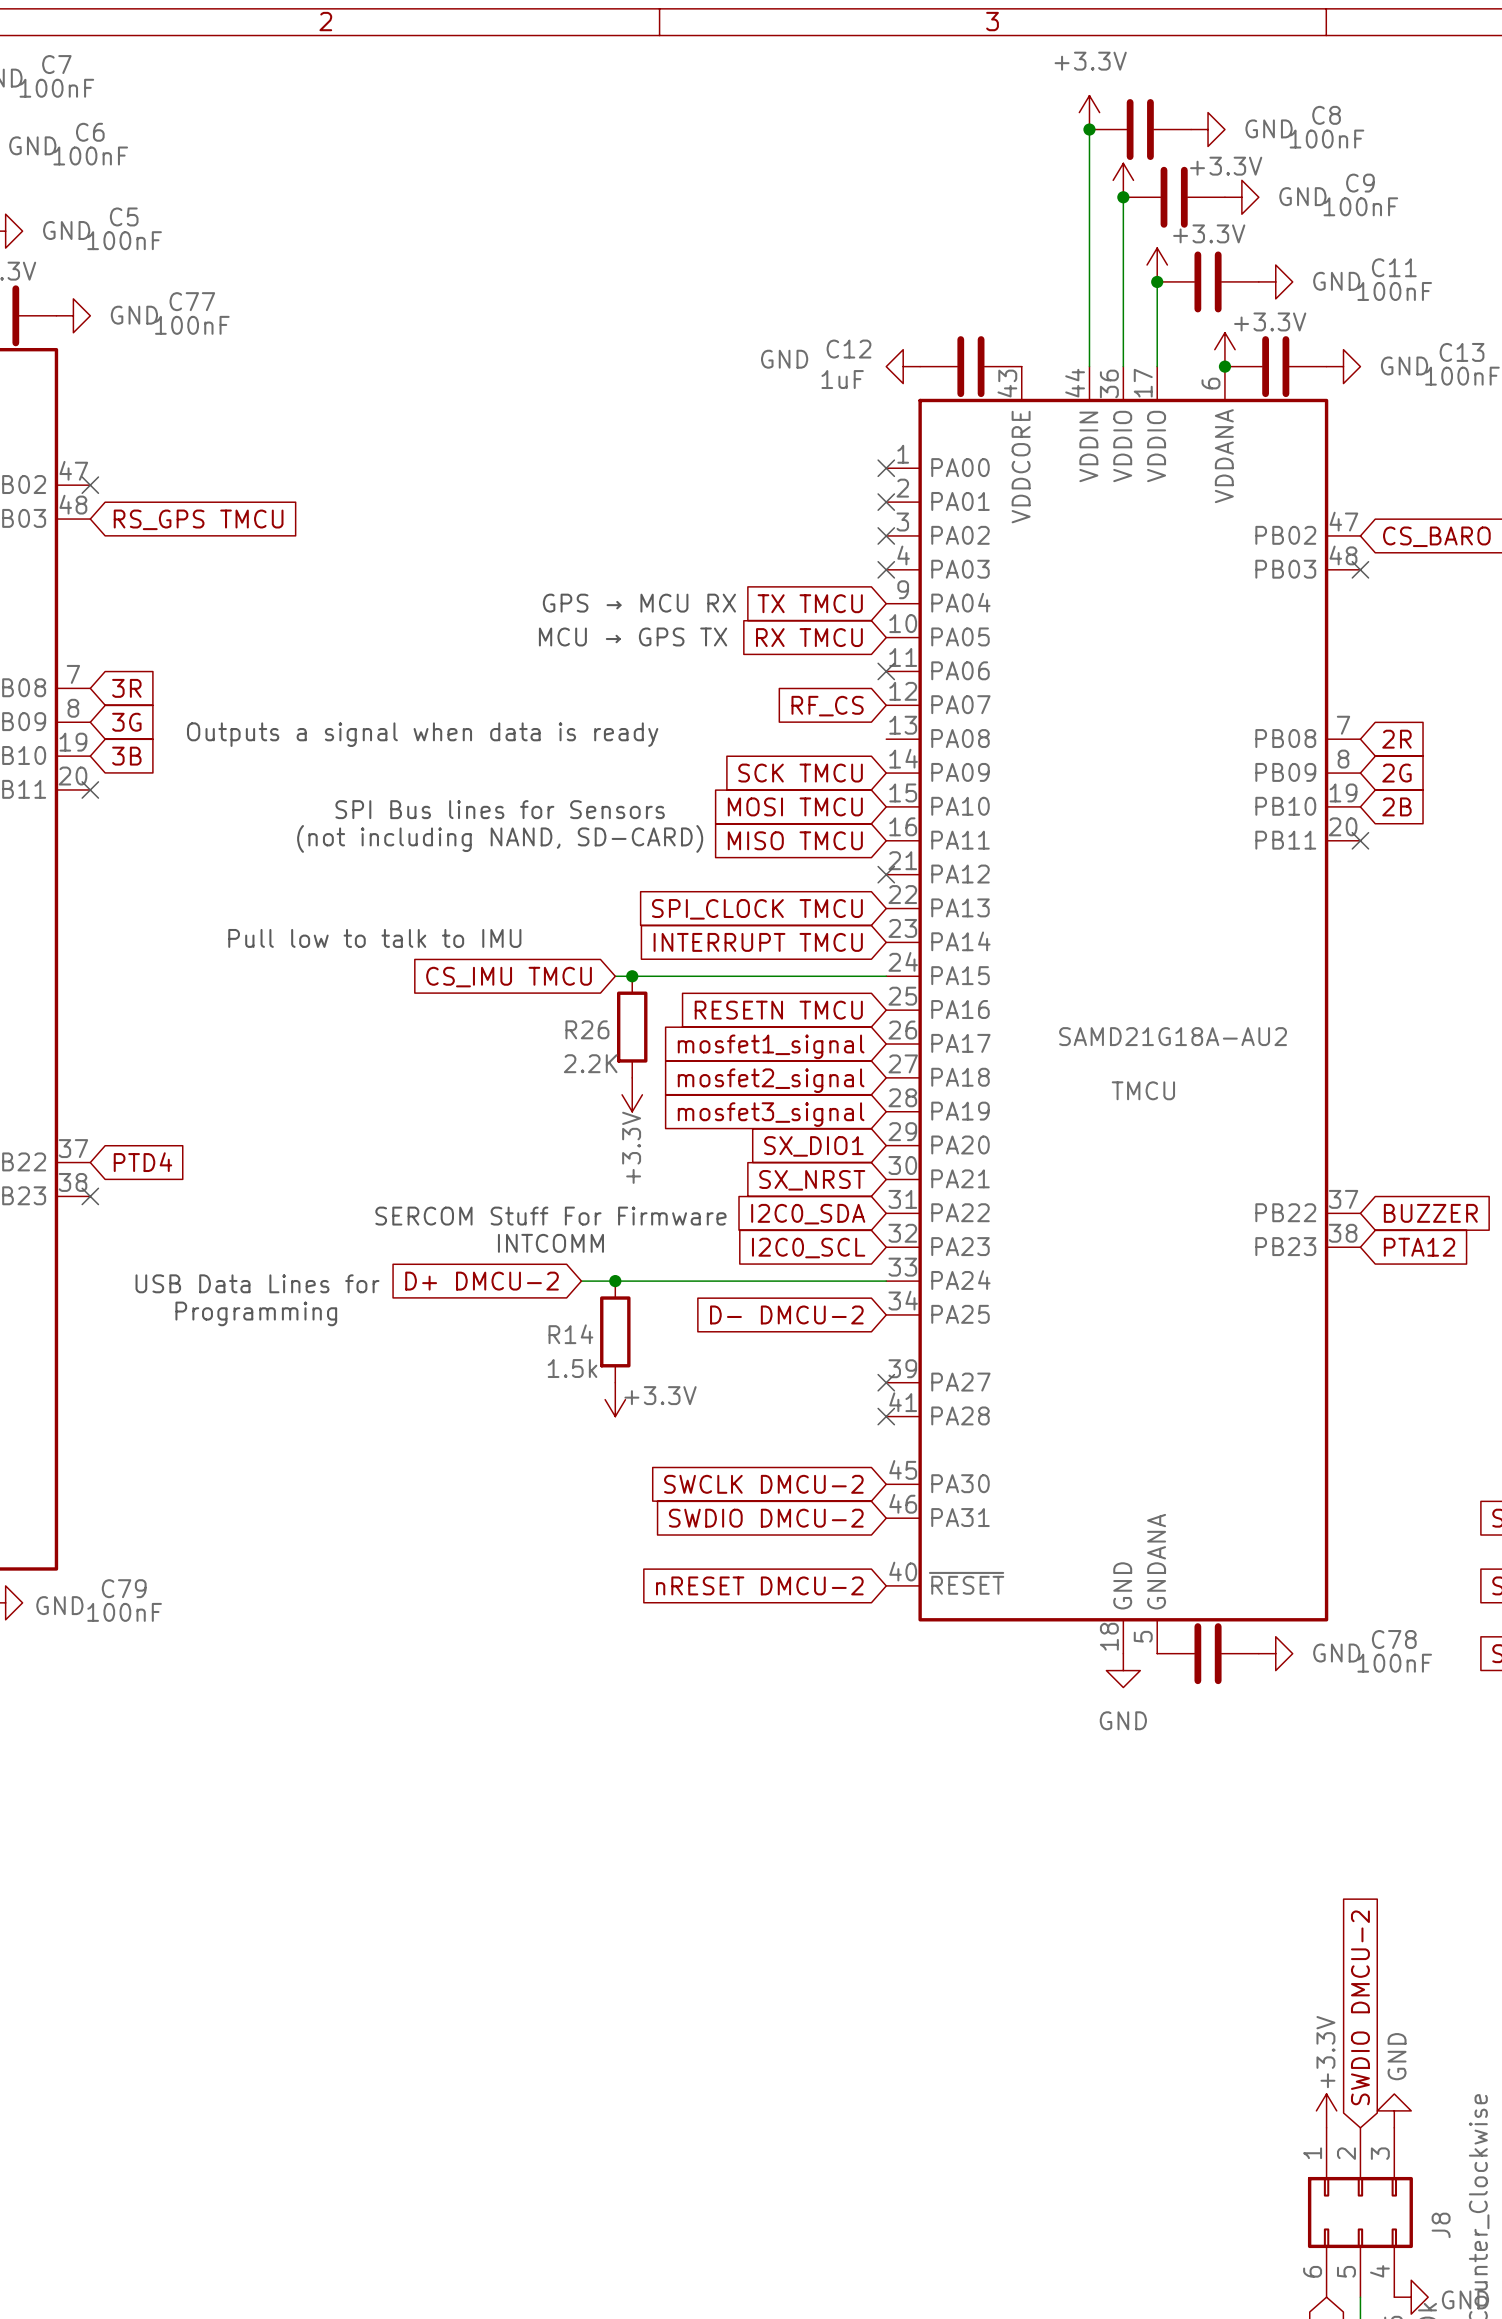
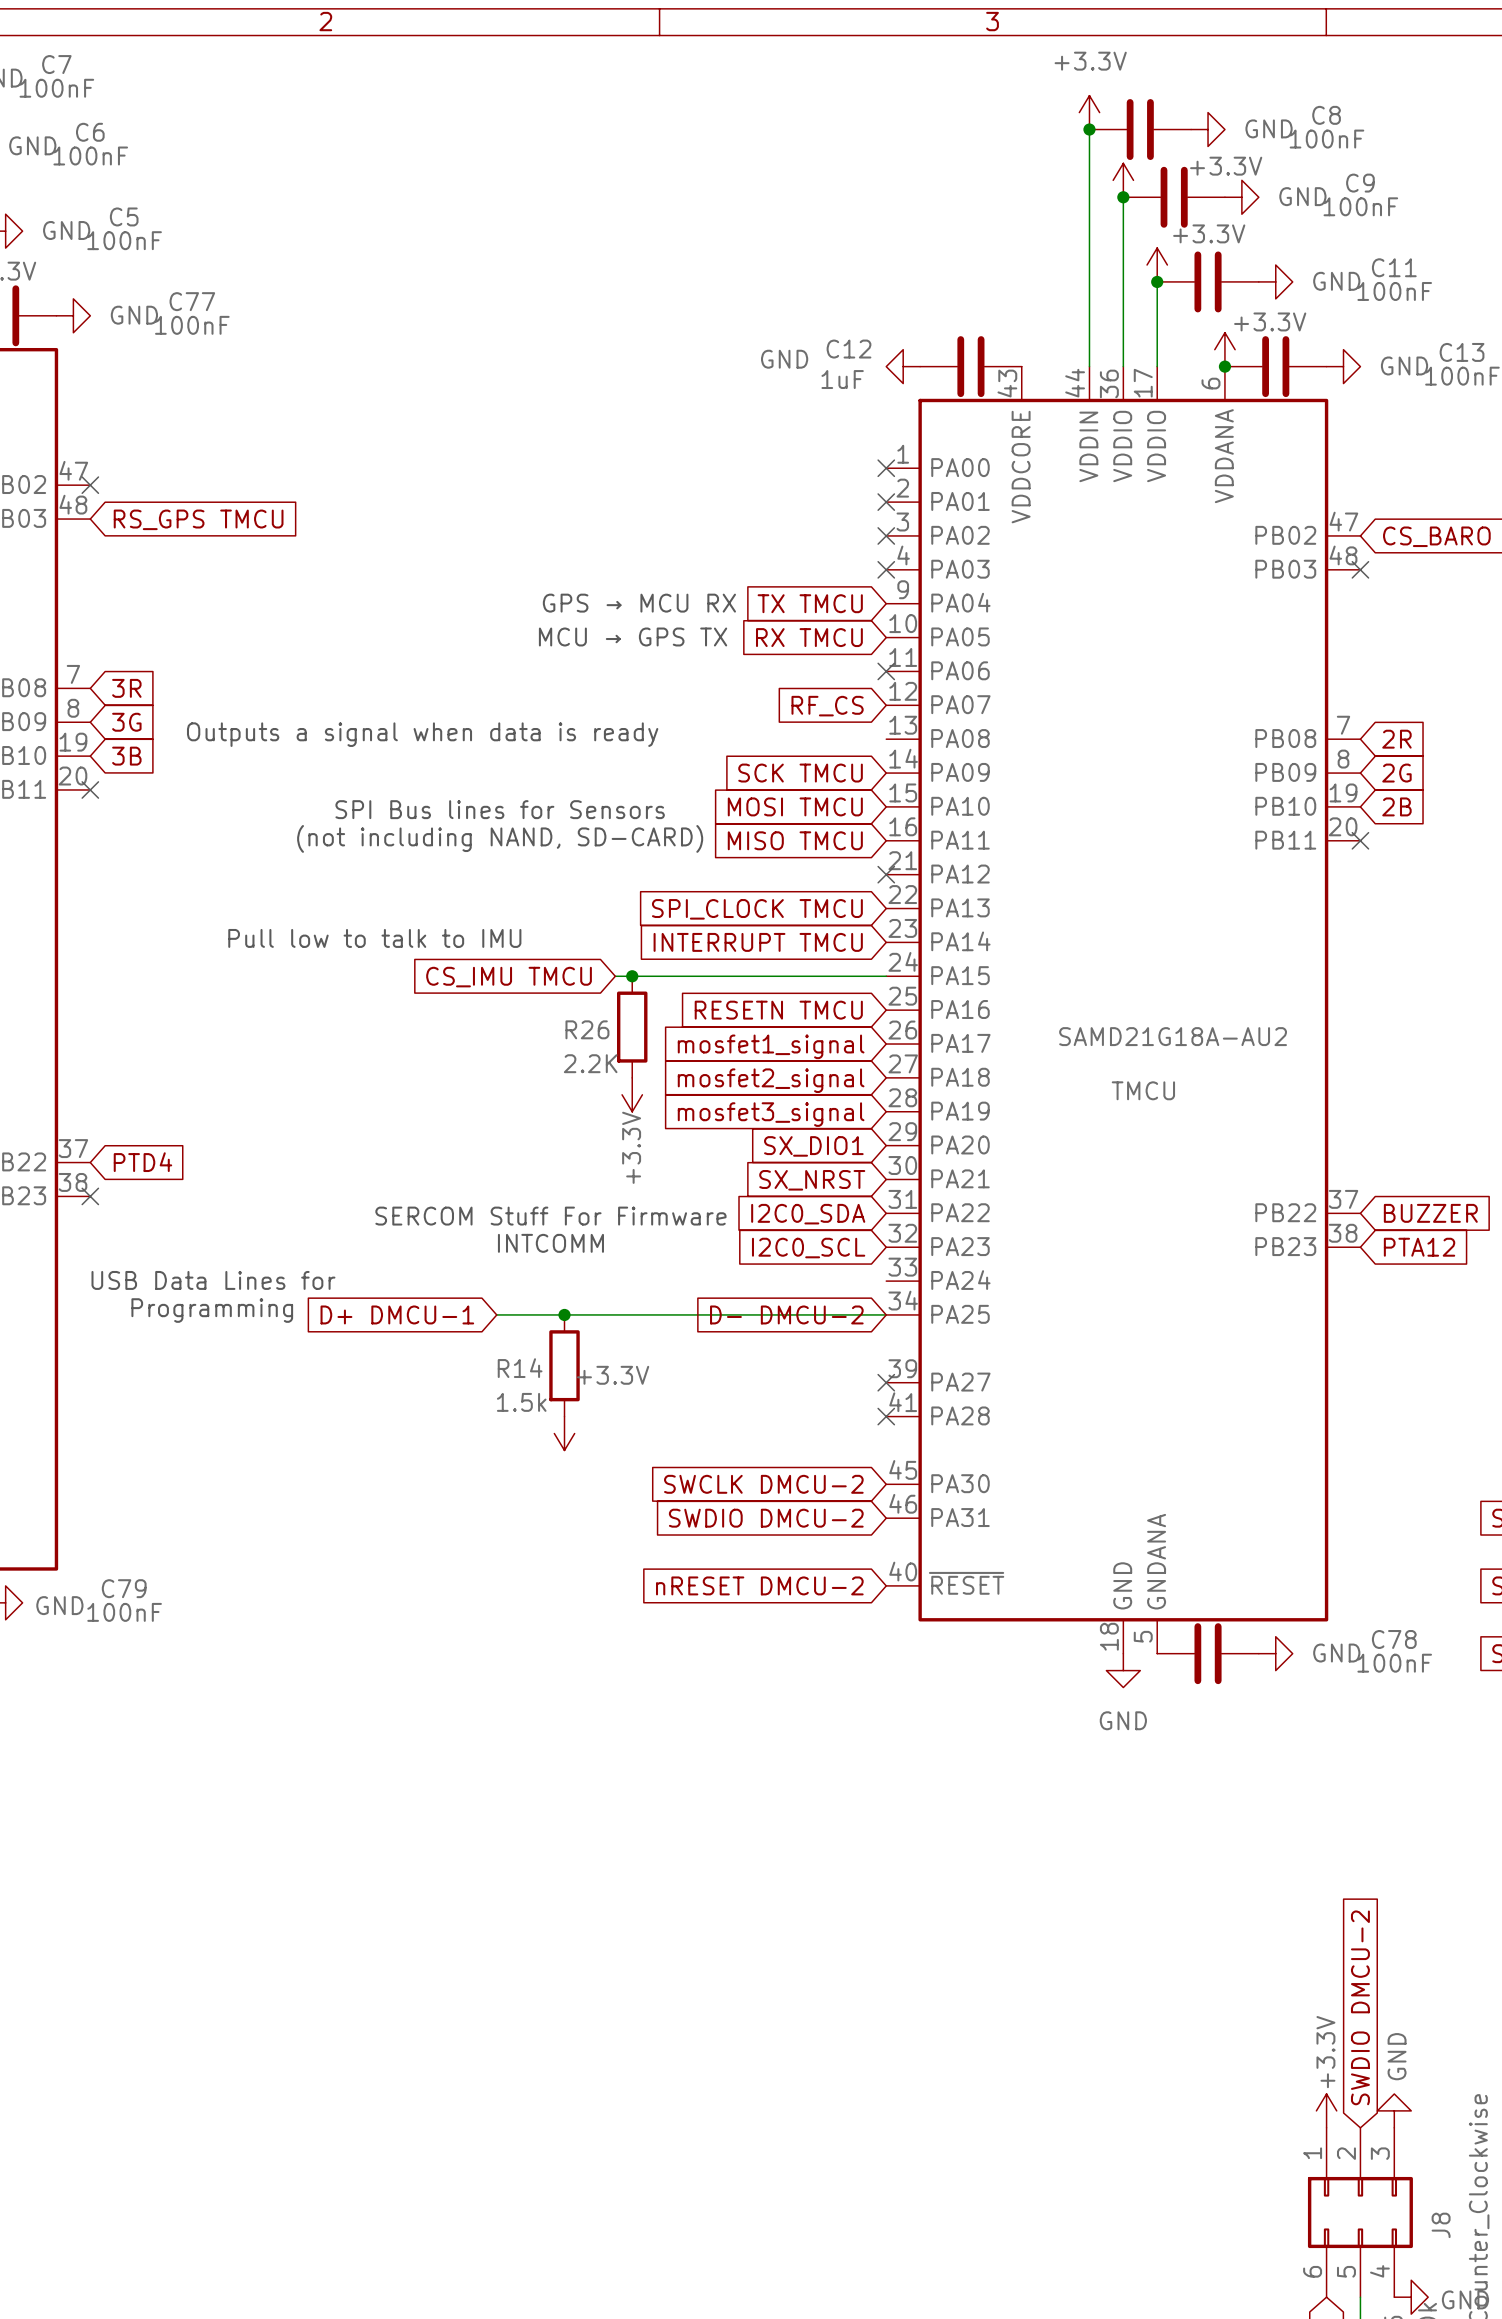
global label: D+ DMCU-2 (482, 1281) -> D+ DMCU-1 (397, 1314)
wire: (581, 1281) (886, 1281) -> none
junction position: (615, 1281) -> (564, 1314)
text position: USB Data Lines for (257, 1283) -> USB Data Lines for (213, 1280)
text position: Programming (256, 1313) -> Programming (212, 1310)
wire: none -> (496, 1314) (886, 1314)
R14 position: (615, 1331) -> (564, 1365)
power symbol text position: +3.3V (660, 1395) -> +3.3V (613, 1375)
power symbol position: +3.3V (615, 1399) -> +3.3V (564, 1433)

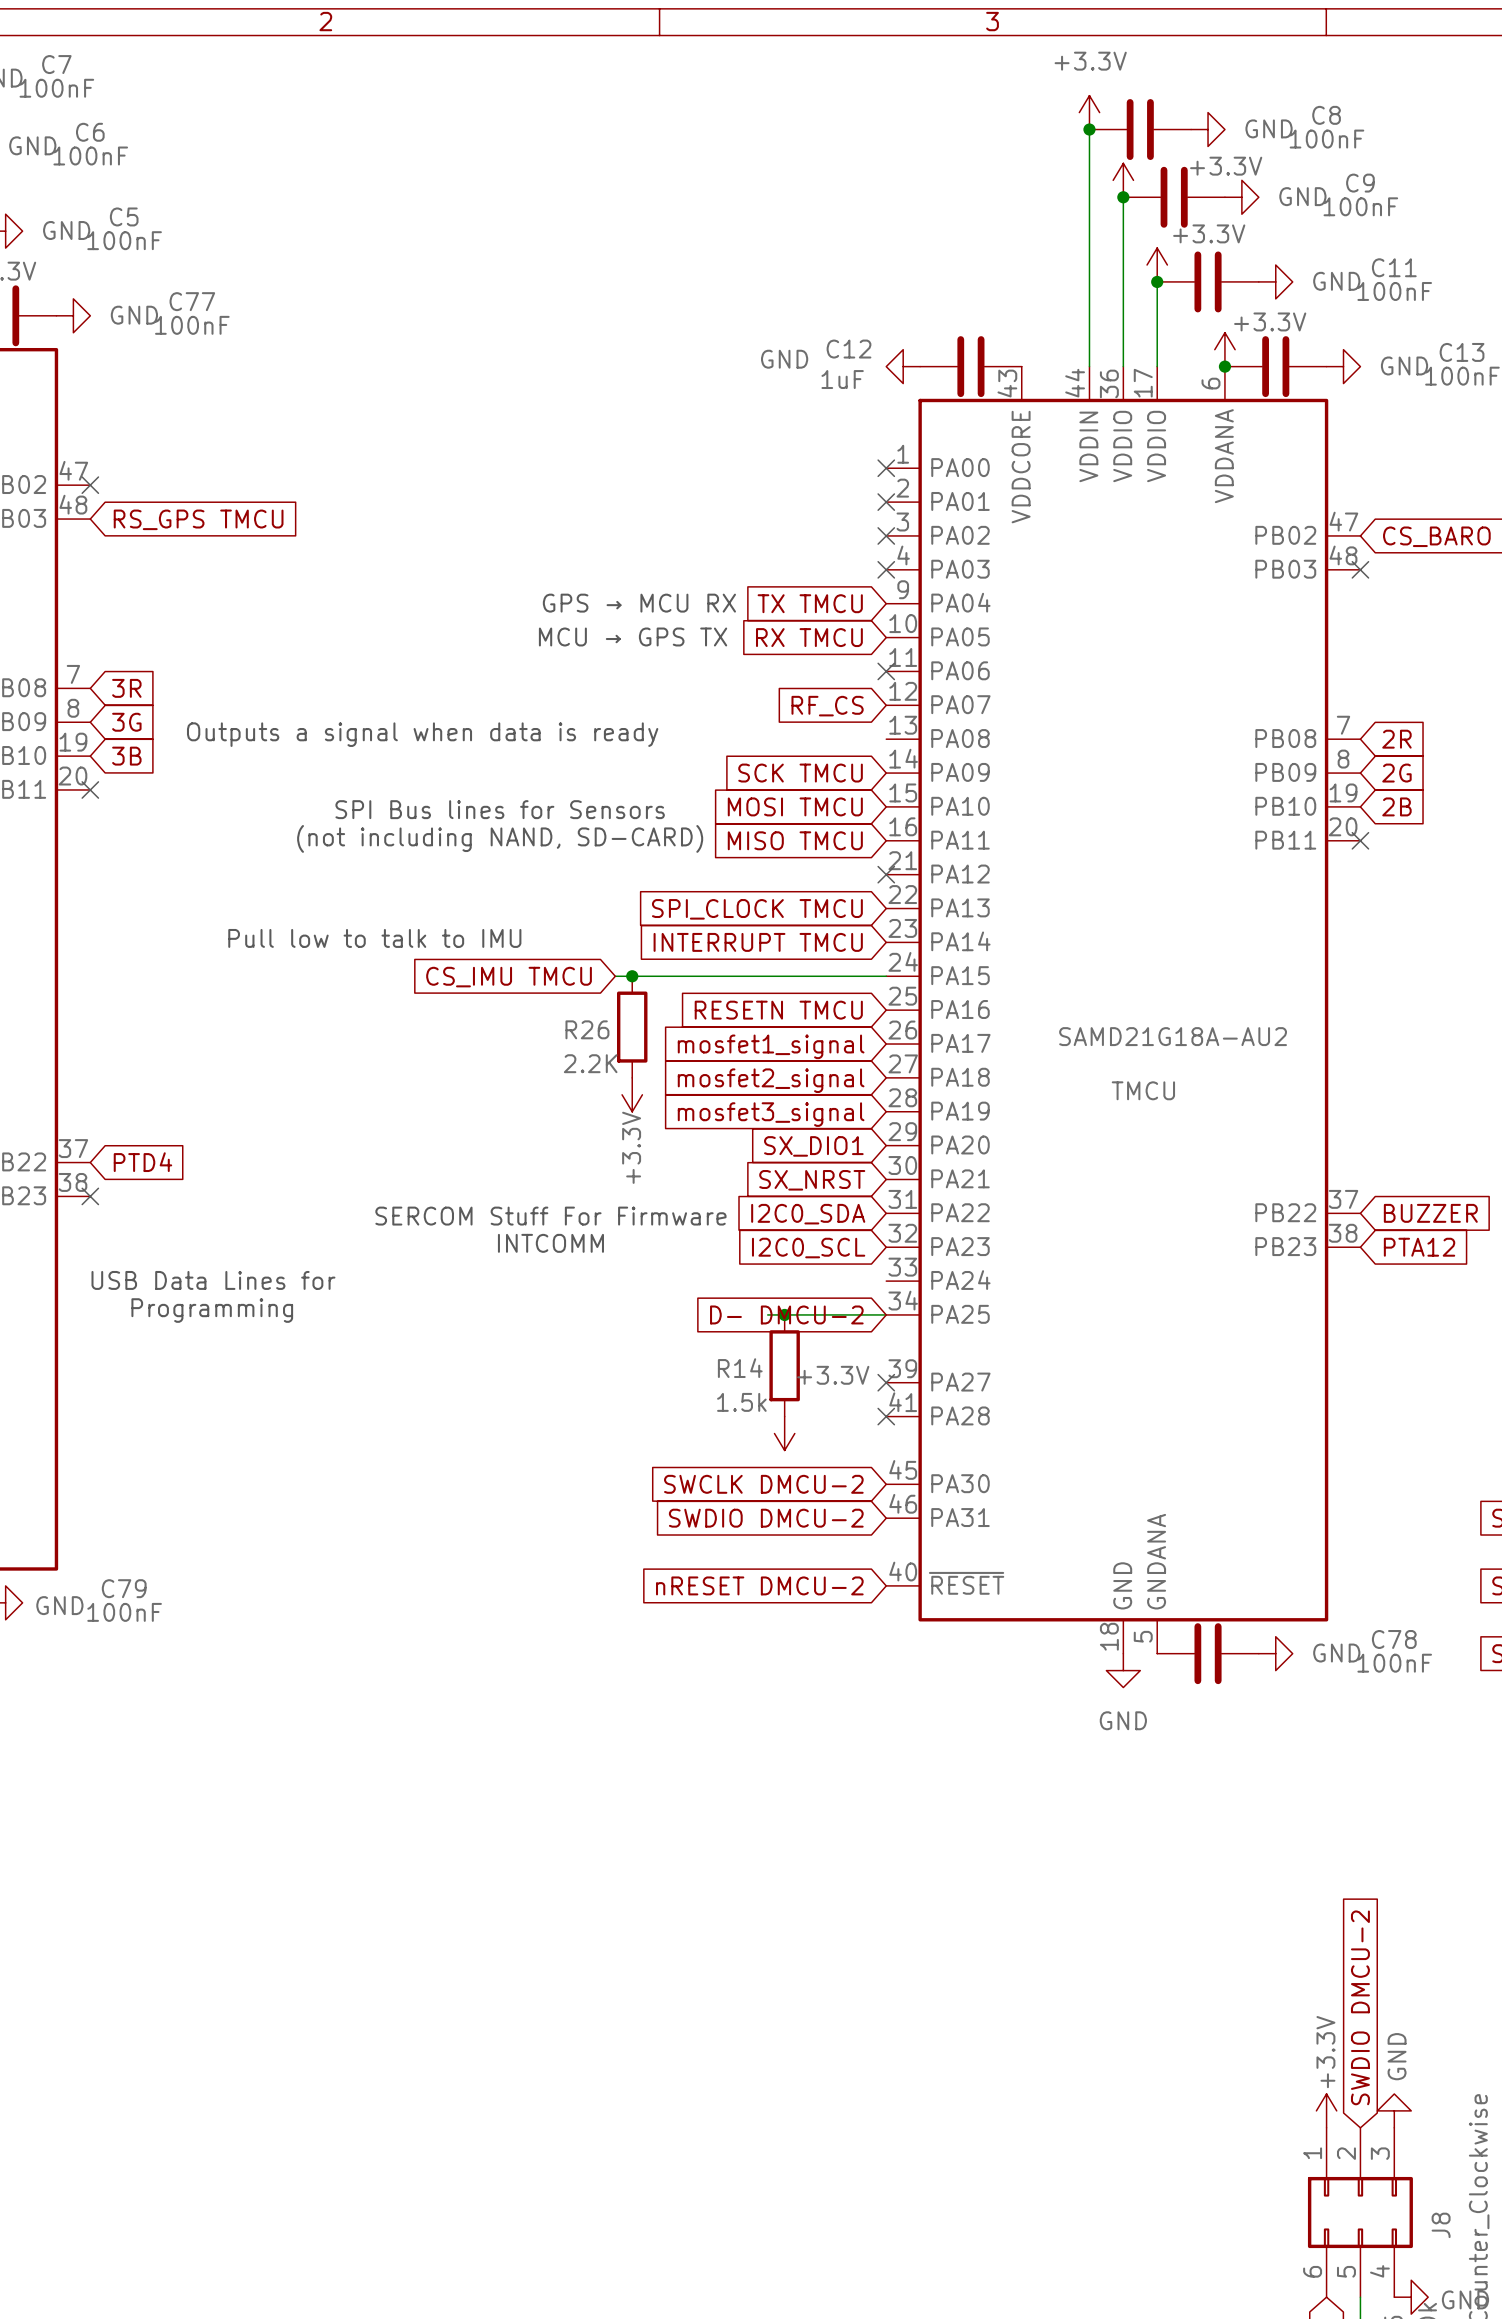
global label: D+ DMCU-1 (397, 1314) -> none
wire: (496, 1314) (767, 1314) -> none
junction: (564, 1314) -> none
junction: none -> (784, 1314)
R14 position: (564, 1365) -> (784, 1365)
power symbol position: +3.3V (564, 1433) -> +3.3V (784, 1433)

